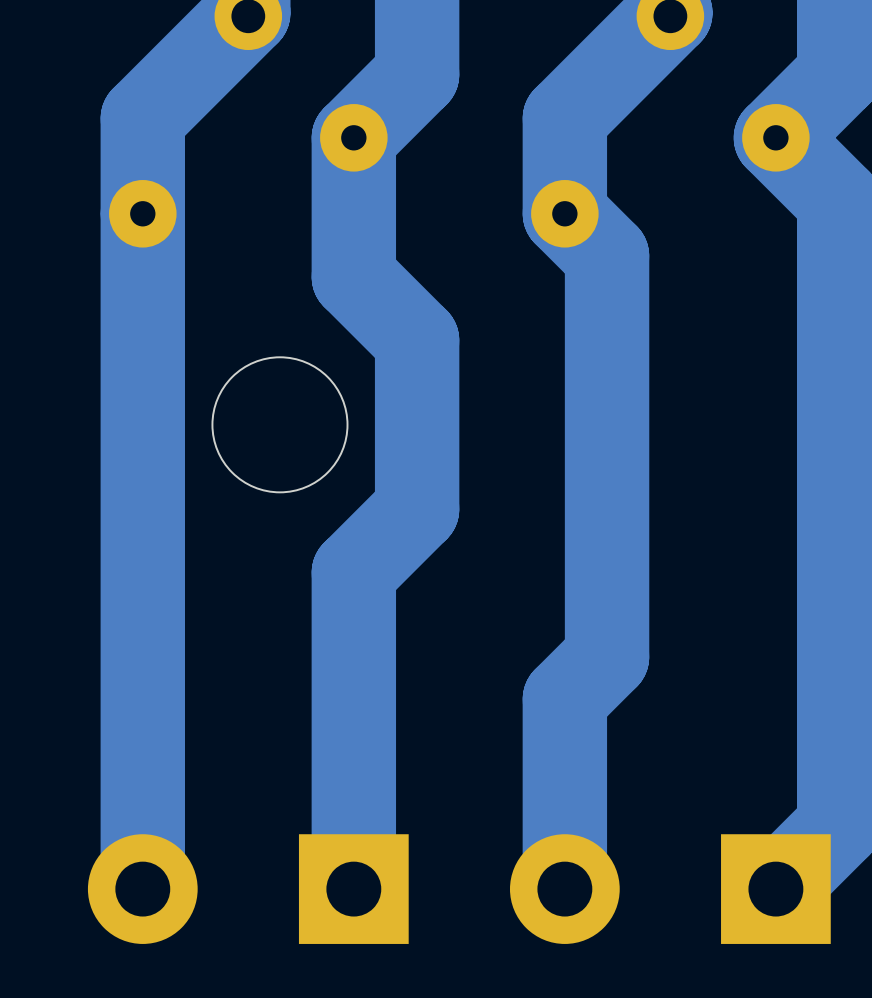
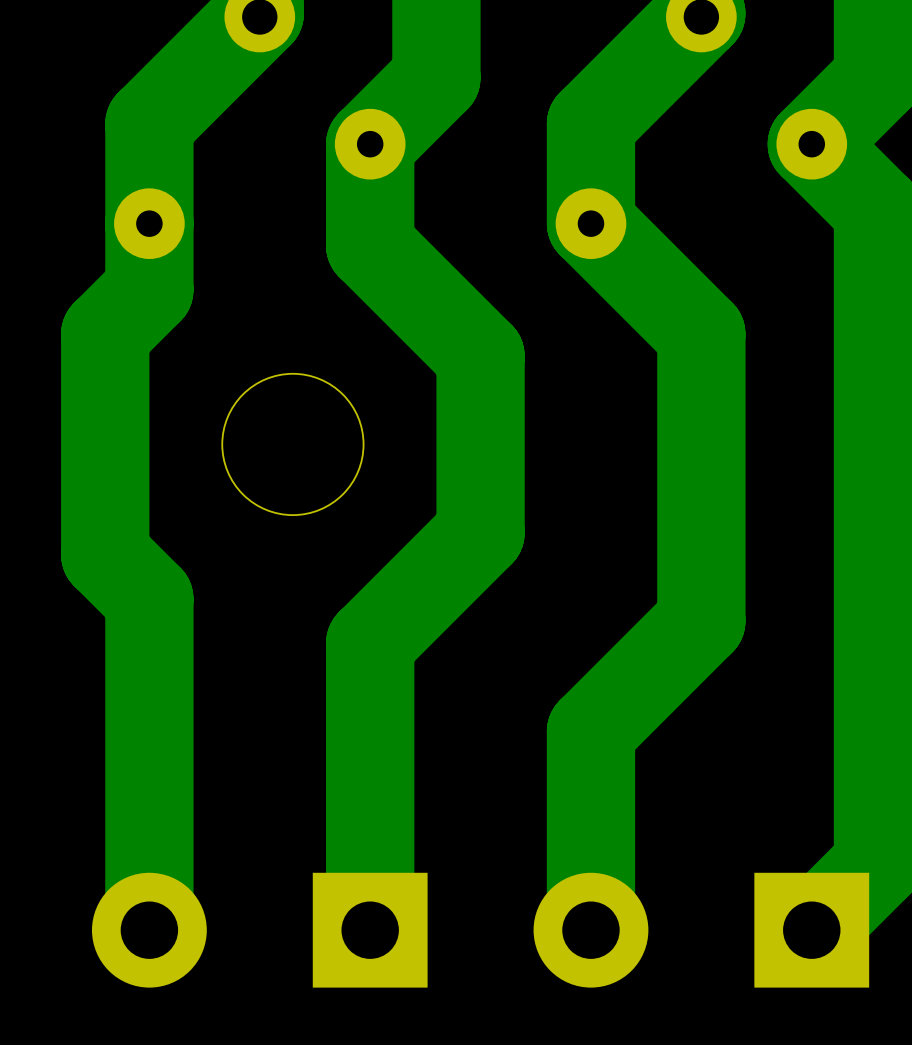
track: (353, 234) (353, 277) (417, 340) (417, 509) (353, 572) (353, 614) -> (370, 245) (480, 356) (480, 532) (370, 643)
track: (607, 255) (607, 656) -> (635, 267) (701, 334) (701, 621) (635, 687)
track: (142, 277) (142, 572) -> (149, 289) (105, 334) (105, 554) (149, 599)

